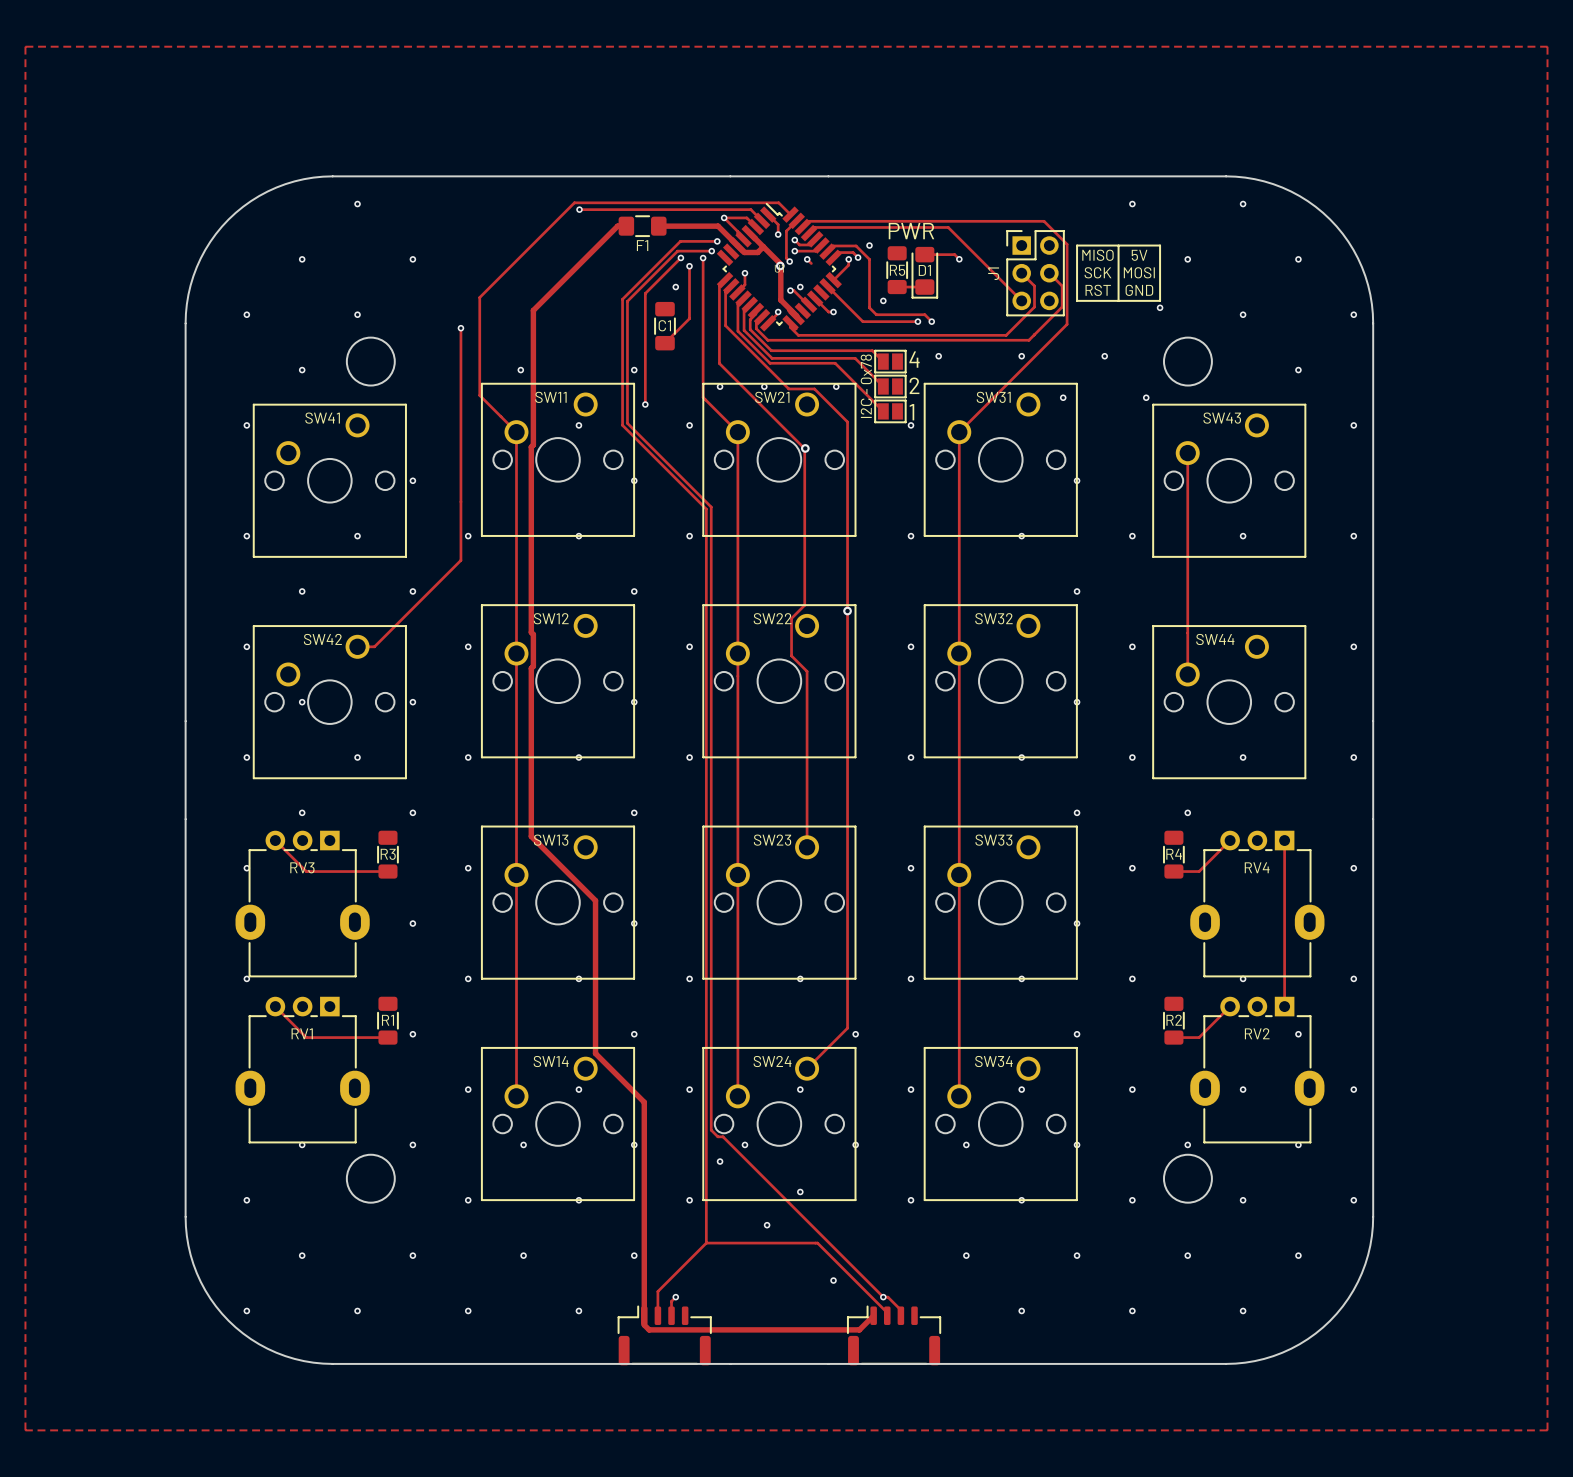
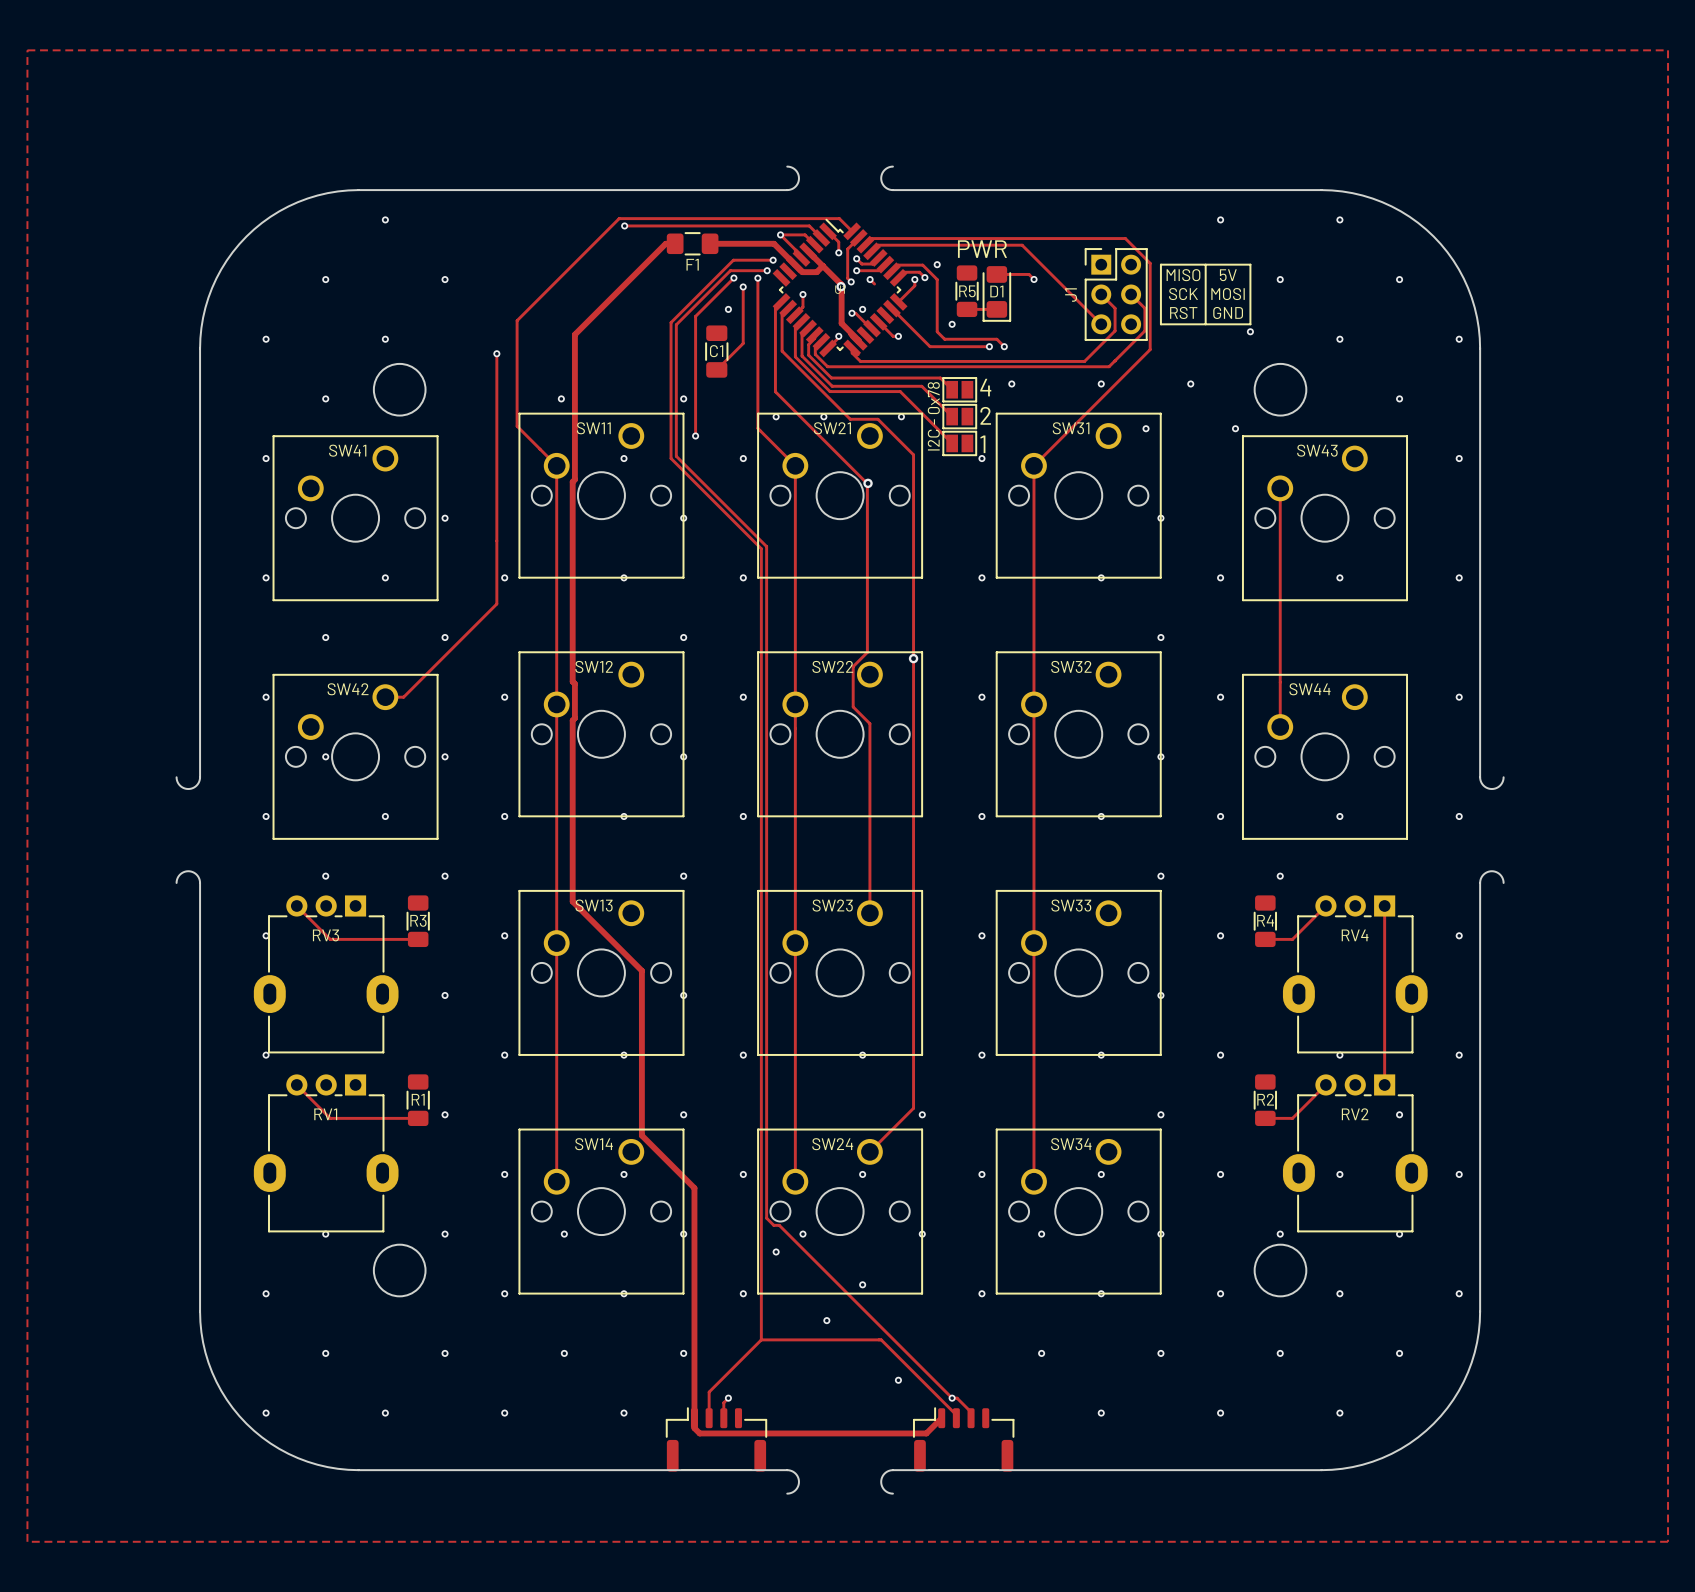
board edge: none -> (892, 166) (884, 170) (881, 178) (884, 186) (892, 190)
board edge: (730, 176) (828, 176) -> (787, 190) (795, 186) (798, 178) (795, 170) (787, 166)
board edge: (185, 721) (185, 819) -> (200, 777) (196, 785) (188, 789) (180, 785) (176, 777)
board edge: (1373, 721) (1373, 819) -> (1480, 777) (1483, 785) (1491, 789) (1500, 785) (1503, 777)
board edge: none -> (176, 882) (180, 874) (188, 871) (196, 874) (200, 882)
board edge: none -> (1480, 882) (1483, 874) (1491, 871) (1500, 874) (1503, 882)
board edge: (730, 1363) (828, 1363) -> (787, 1470) (795, 1473) (798, 1481) (795, 1490) (787, 1493)
board edge: none -> (892, 1470) (884, 1473) (881, 1481) (884, 1490) (892, 1493)

